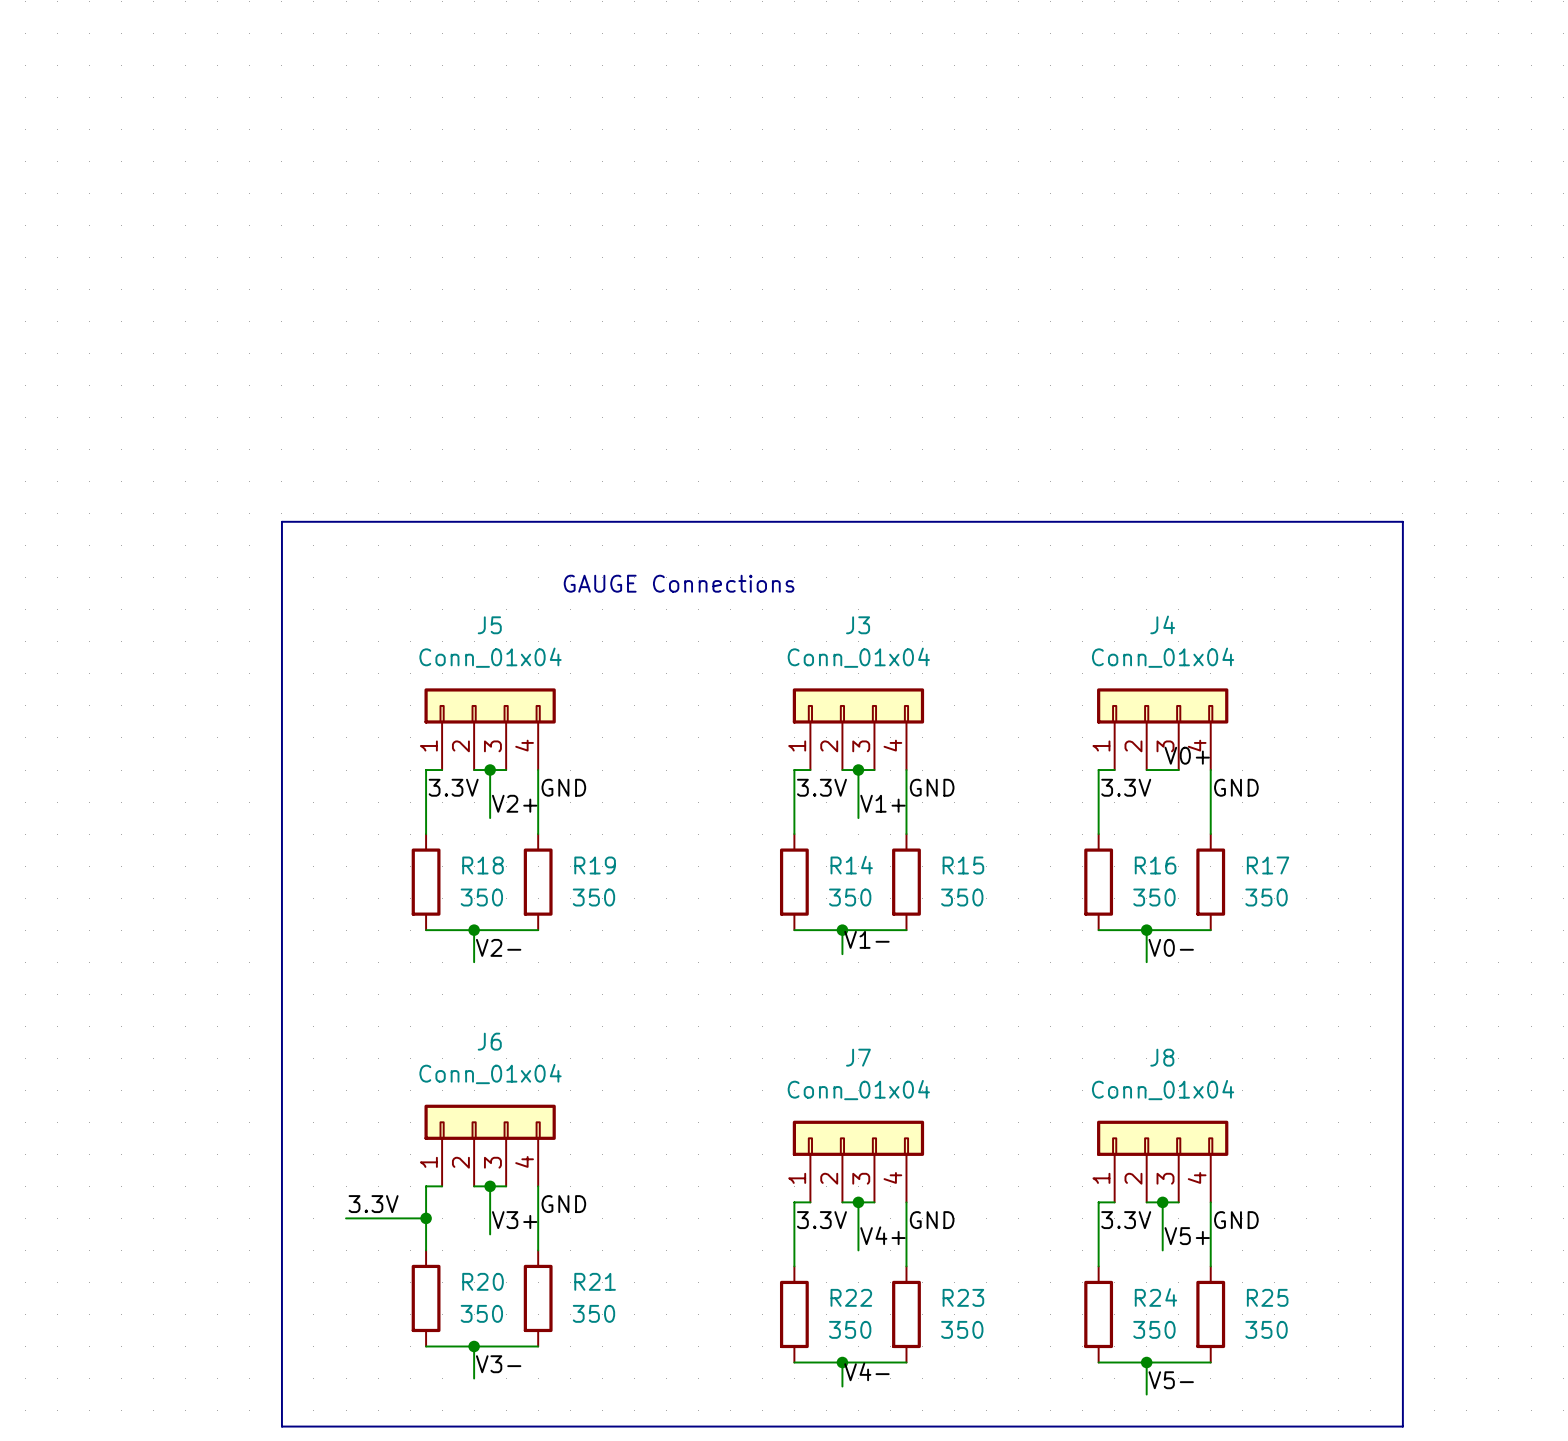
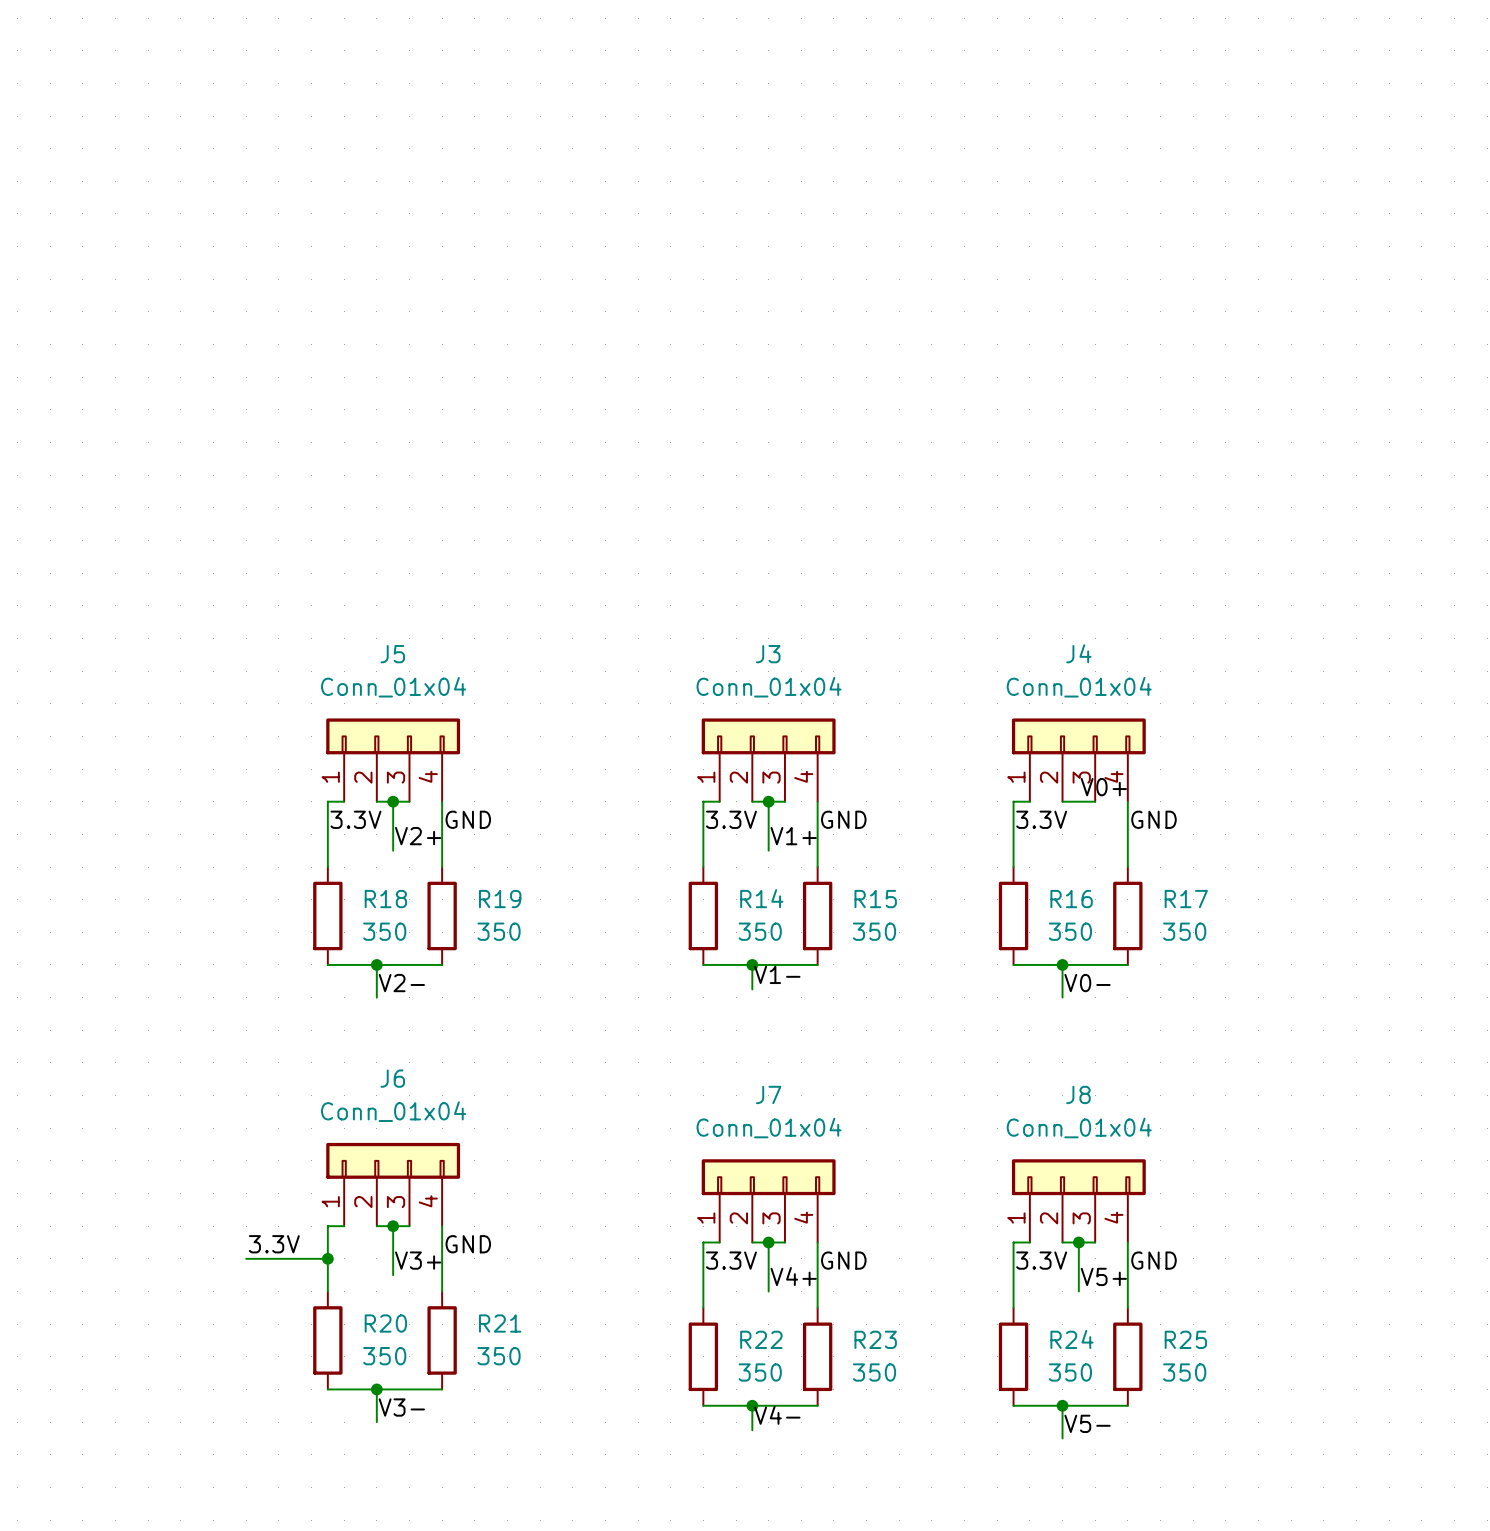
line: (281, 521) (1402, 521) (1402, 1426) (281, 1426) (281, 521) -> none
text: GAUGE Connections (679, 583) -> none

